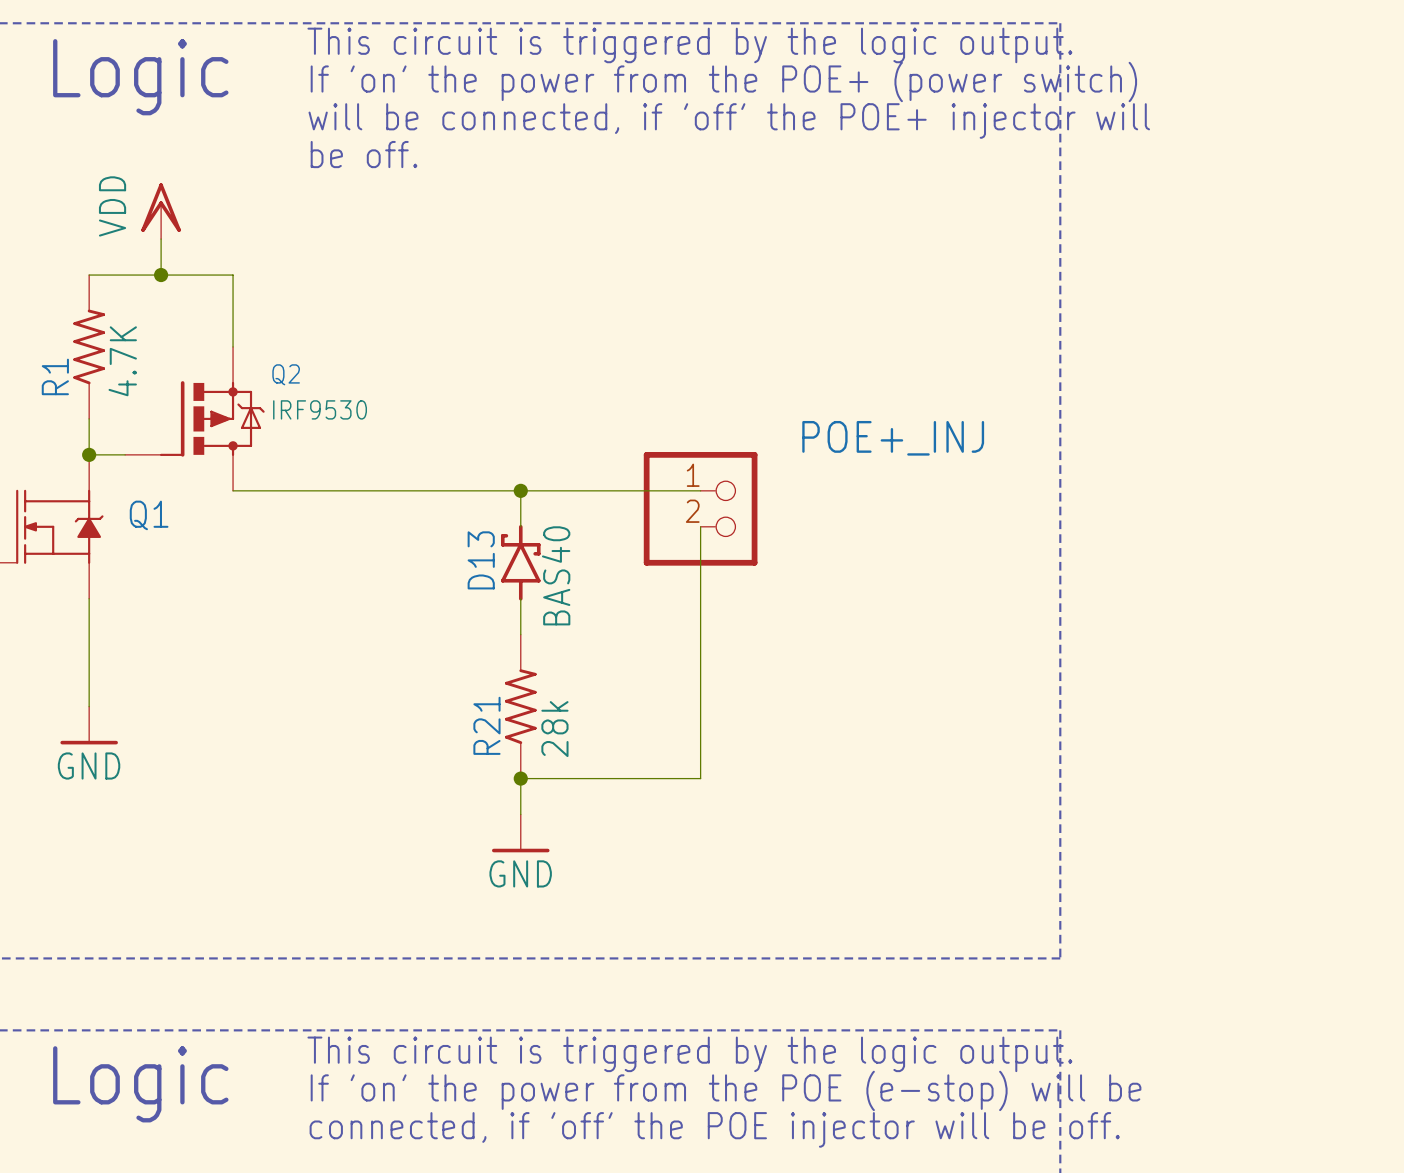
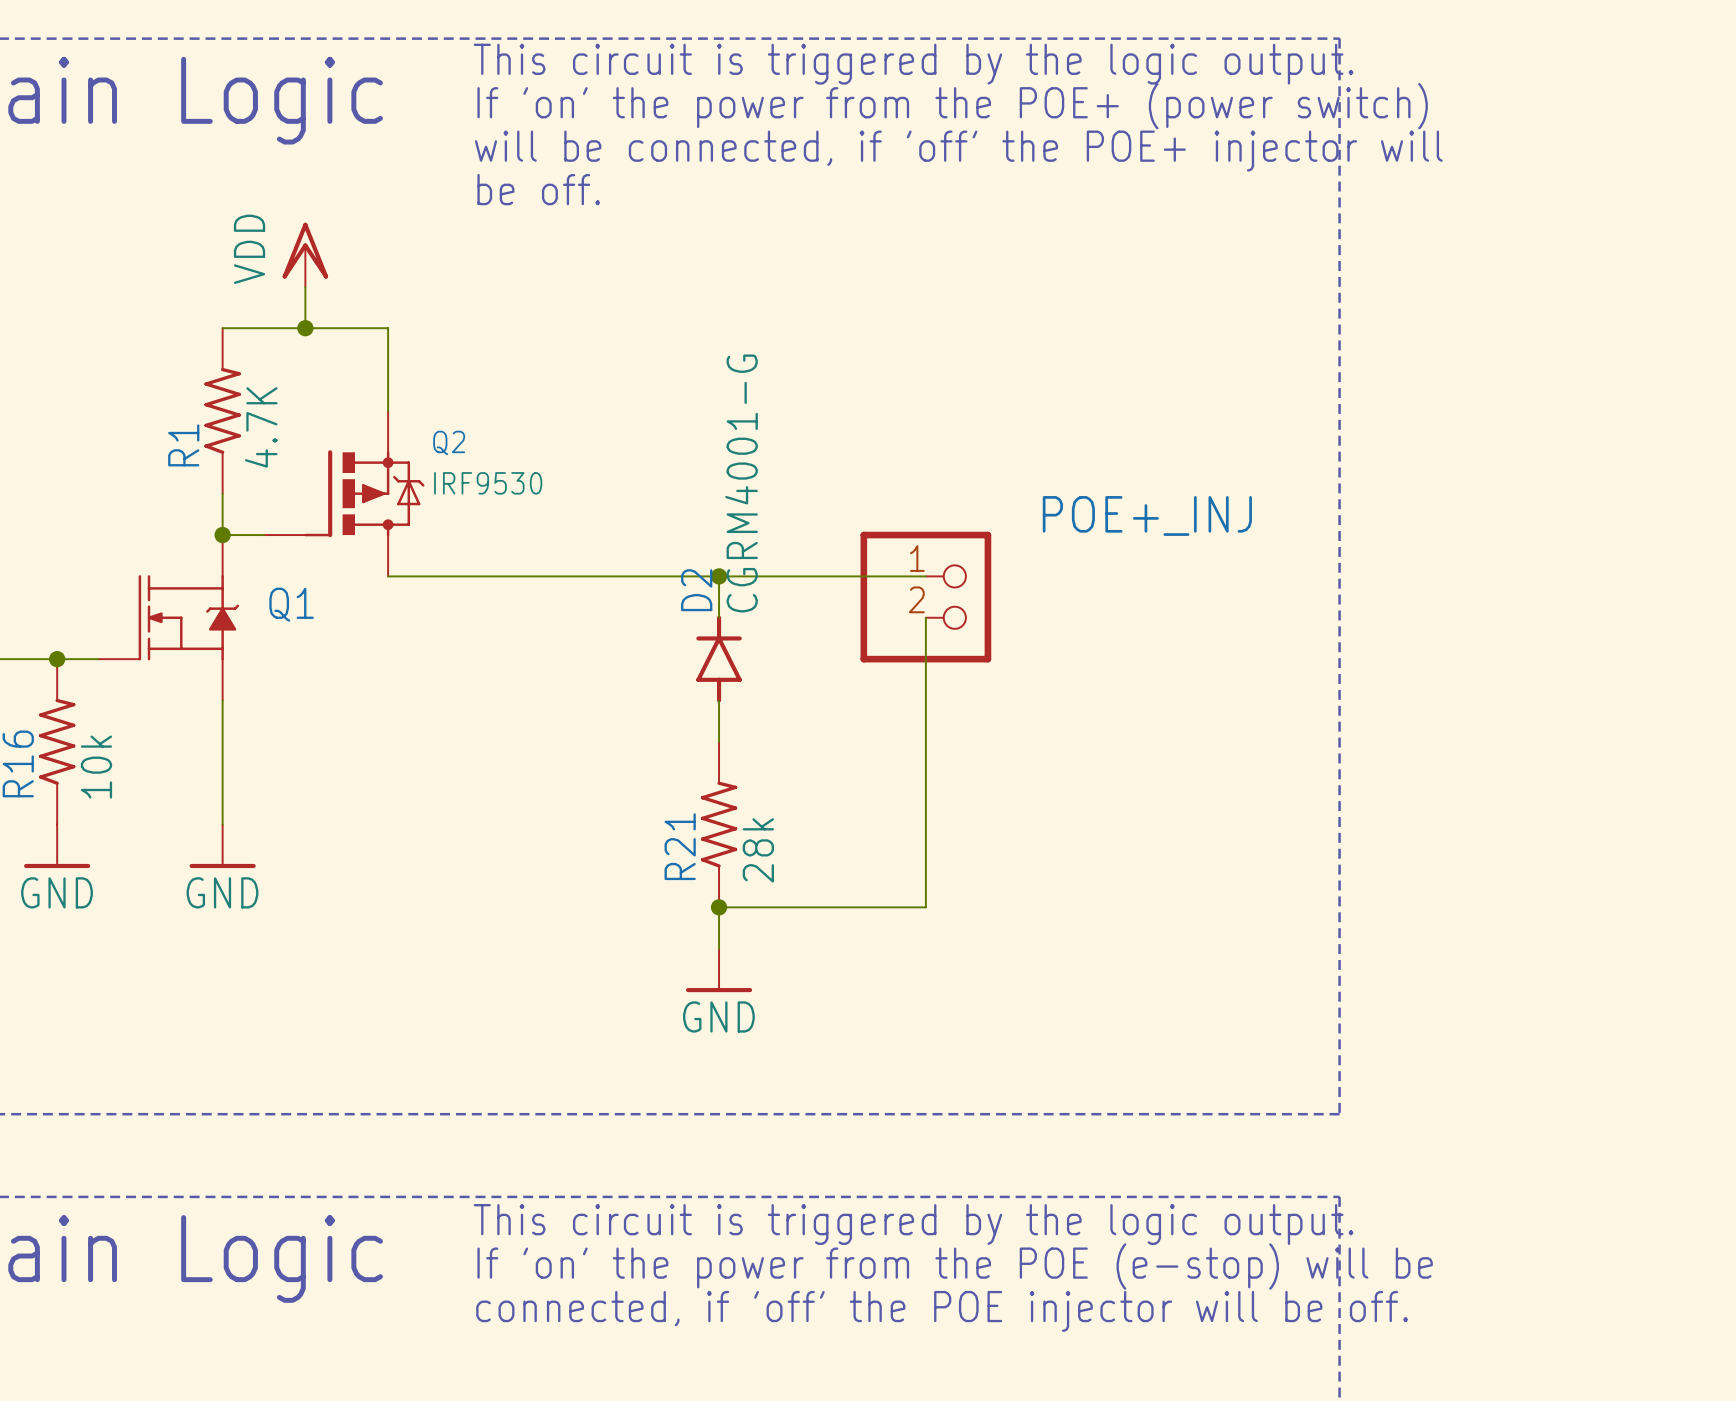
D13: BAS40 (520, 562) -> none
D2: none -> CGRM4001-G (719, 659)

